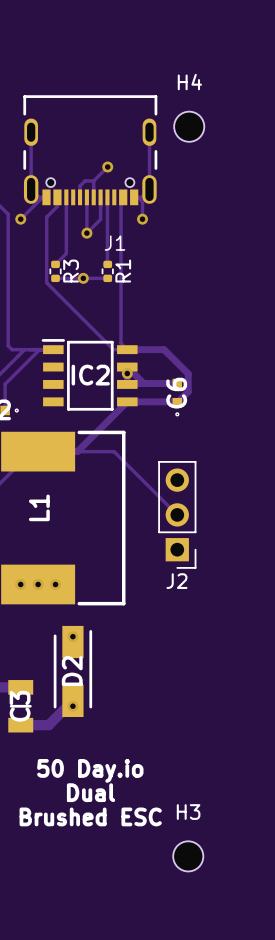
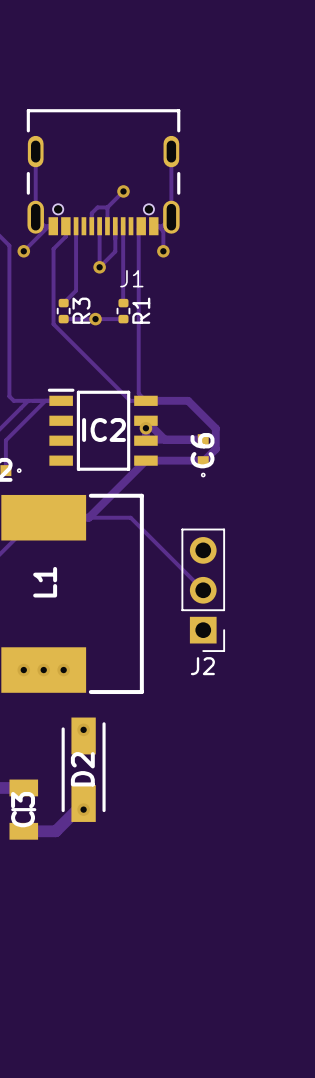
H4: (189, 126) -> none
text: 50 Day.io (90, 770) -> none
text: Dual (91, 792) -> none
text: Brushed ESC (90, 816) -> none
H3: (188, 856) -> none

